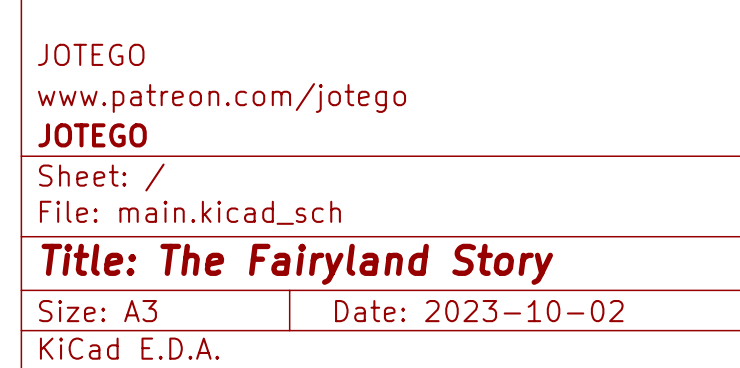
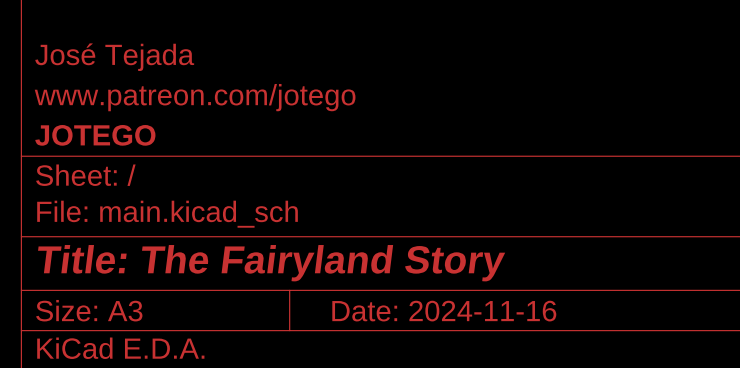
title block: JOTEGO (91, 54) -> José Tejada (114, 57)
title block: Date: 2023-10-02 (479, 311) -> Date: 2024-11-16 (444, 311)

